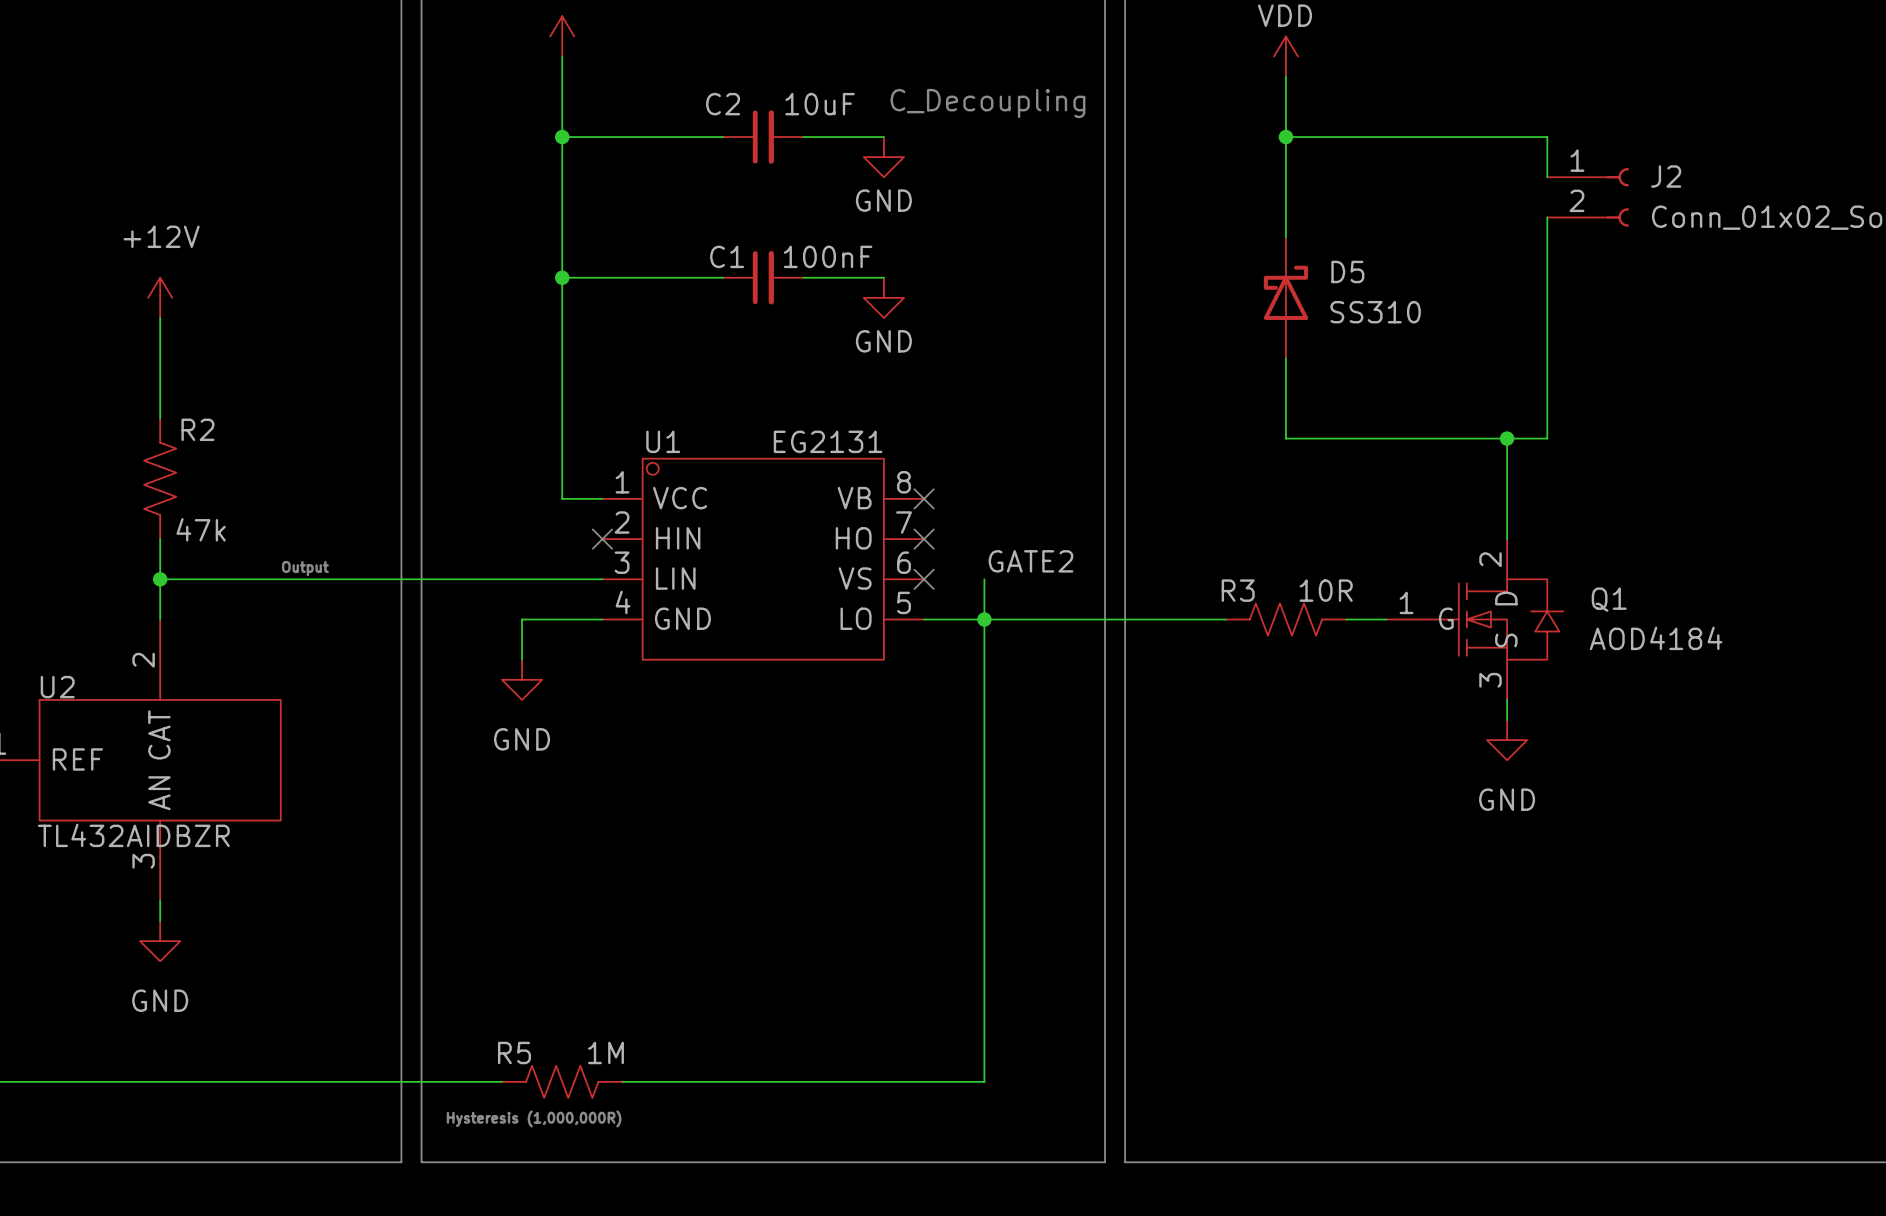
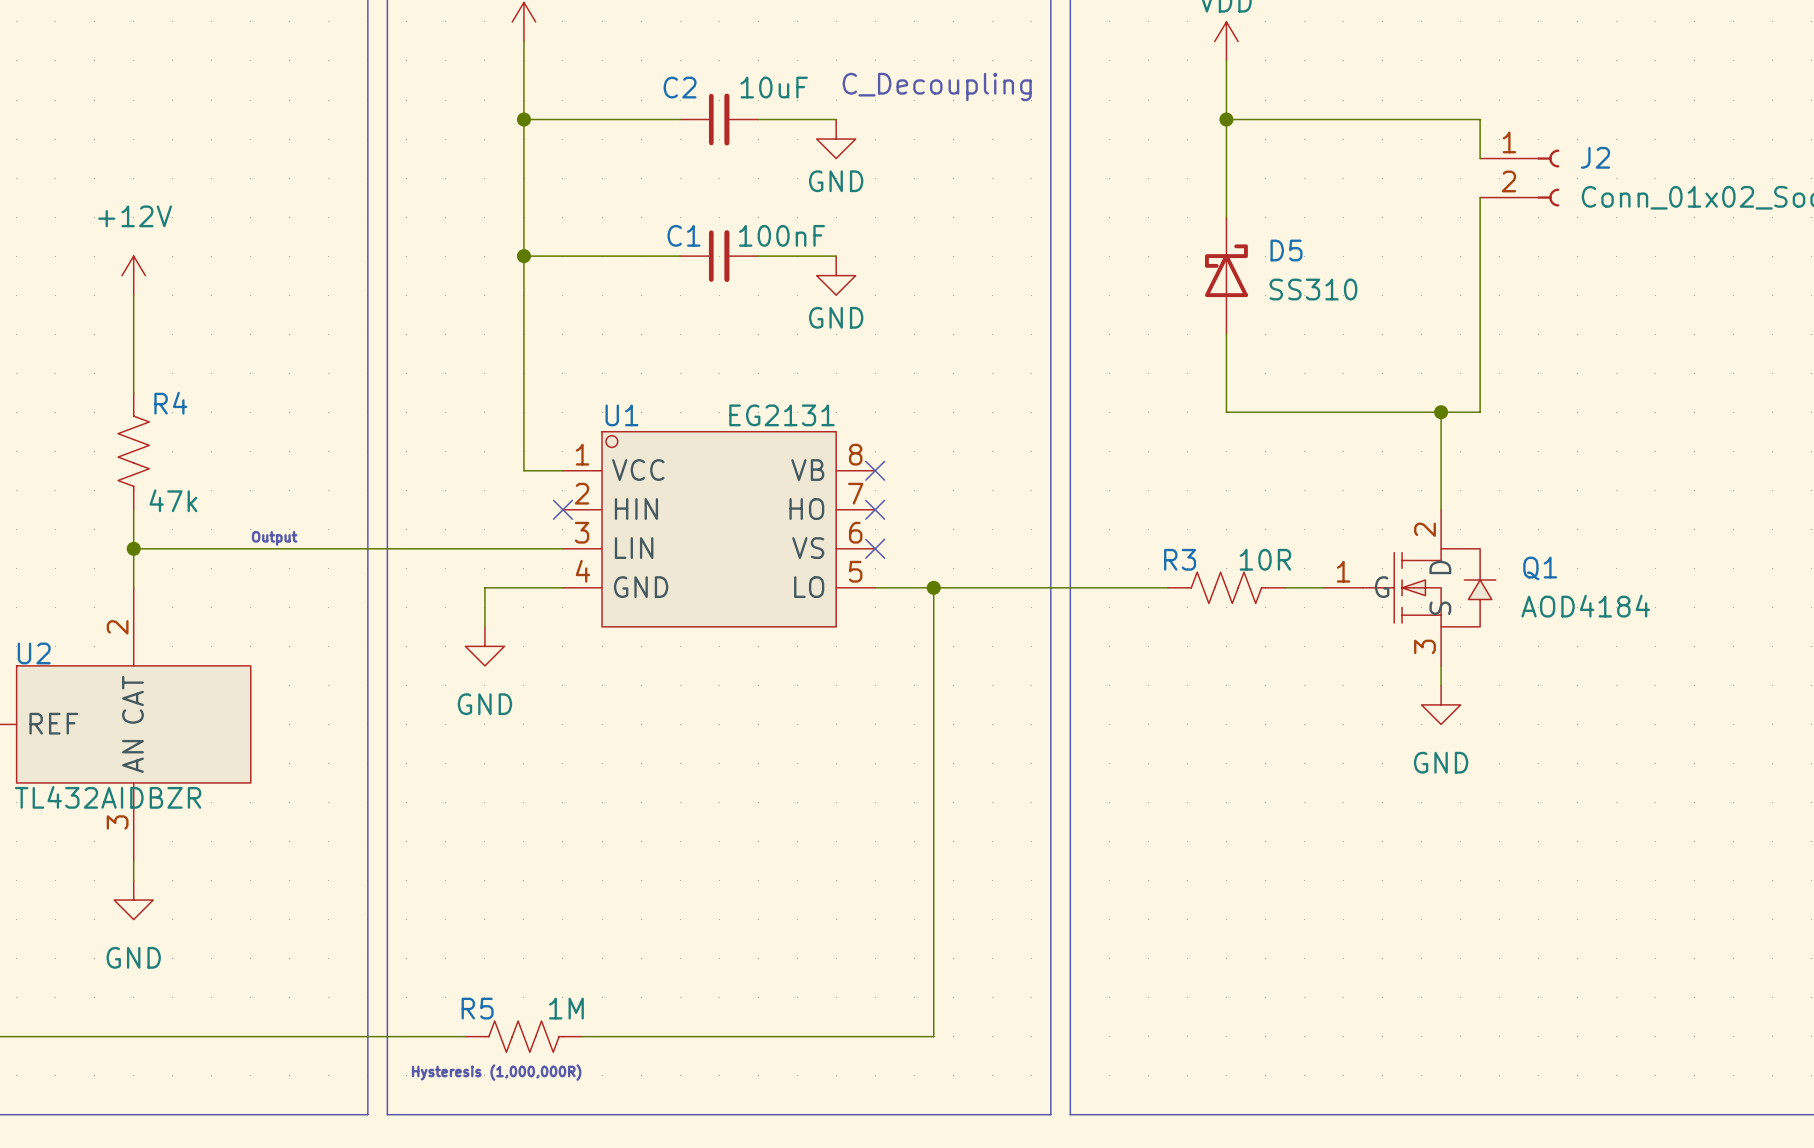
R2 name: R2 (197, 429) -> R4 (170, 403)
label: GATE2 (1030, 561) -> none
wire: (984, 579) (984, 619) -> none

